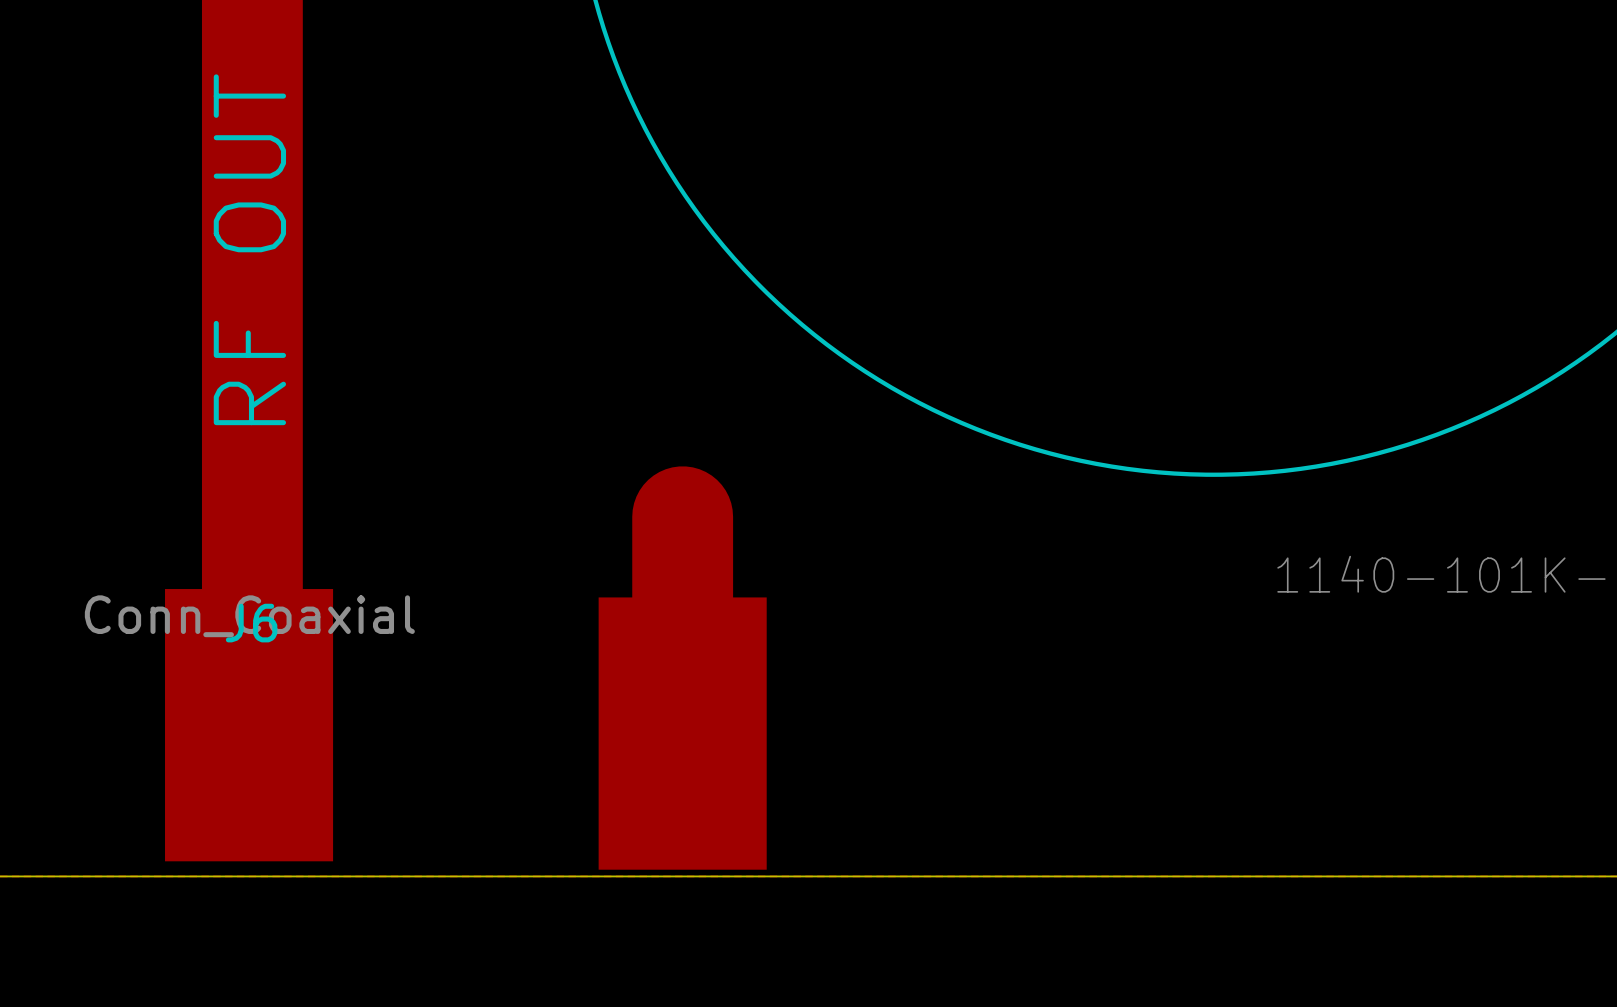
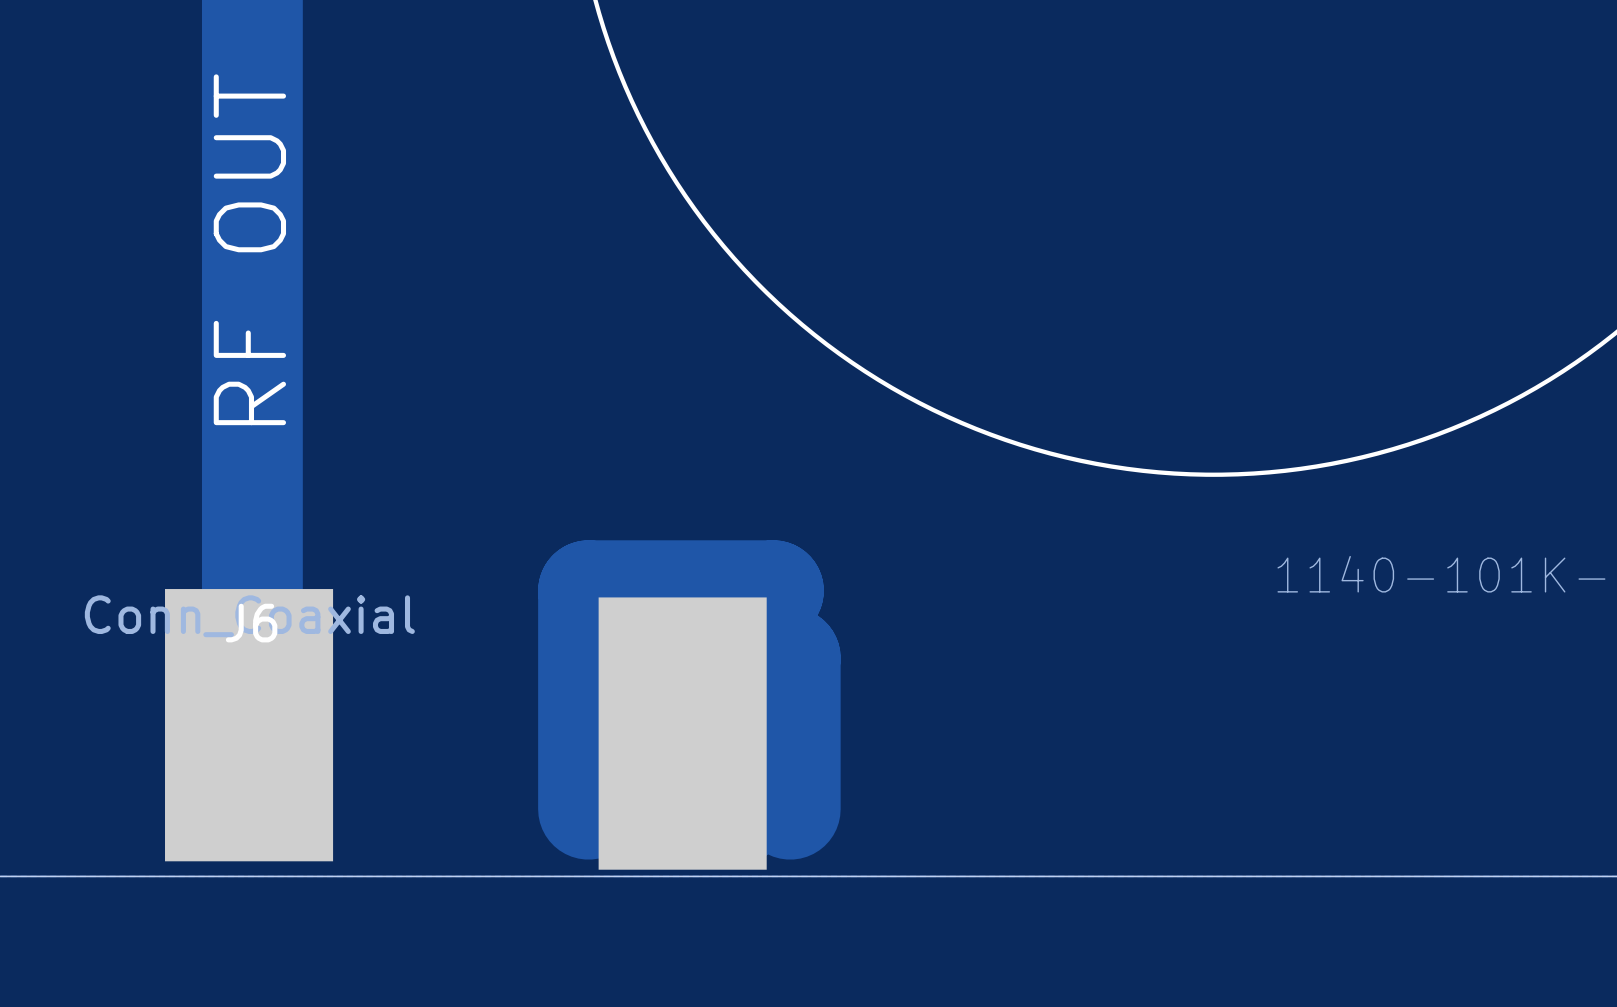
track: (682, 516) (682, 733) -> none
track: none -> (588, 809) (588, 590) (773, 590) (732, 631) (732, 818) (682, 768) (682, 733) (714, 733) (790, 657) (790, 809)

